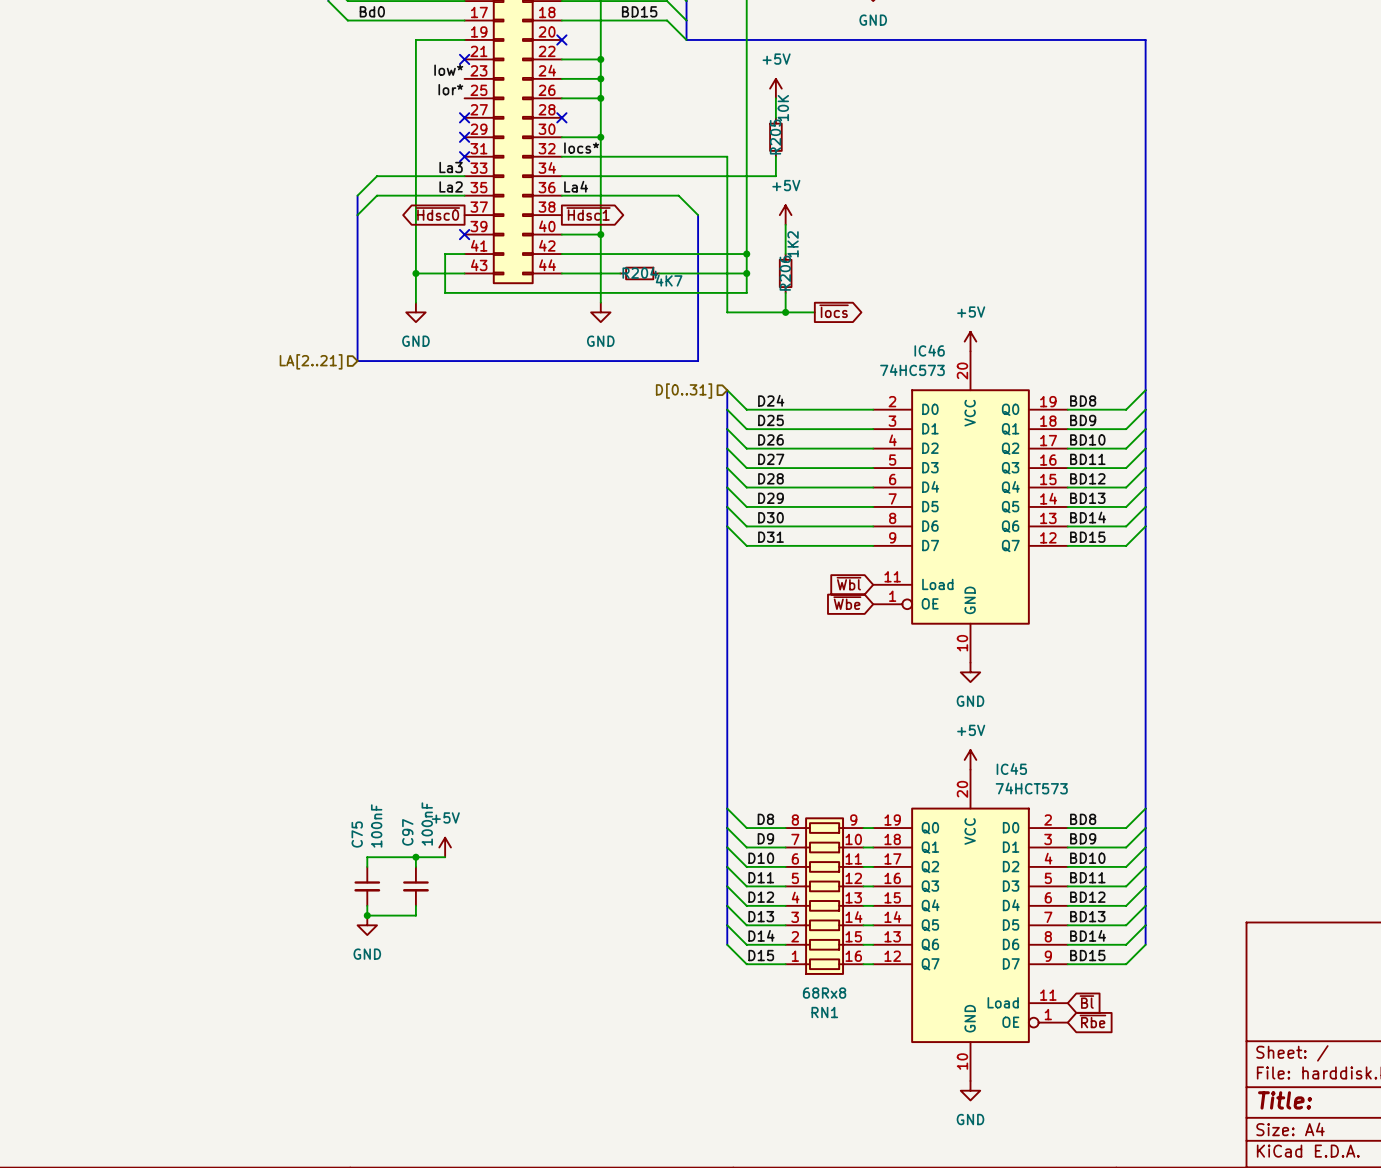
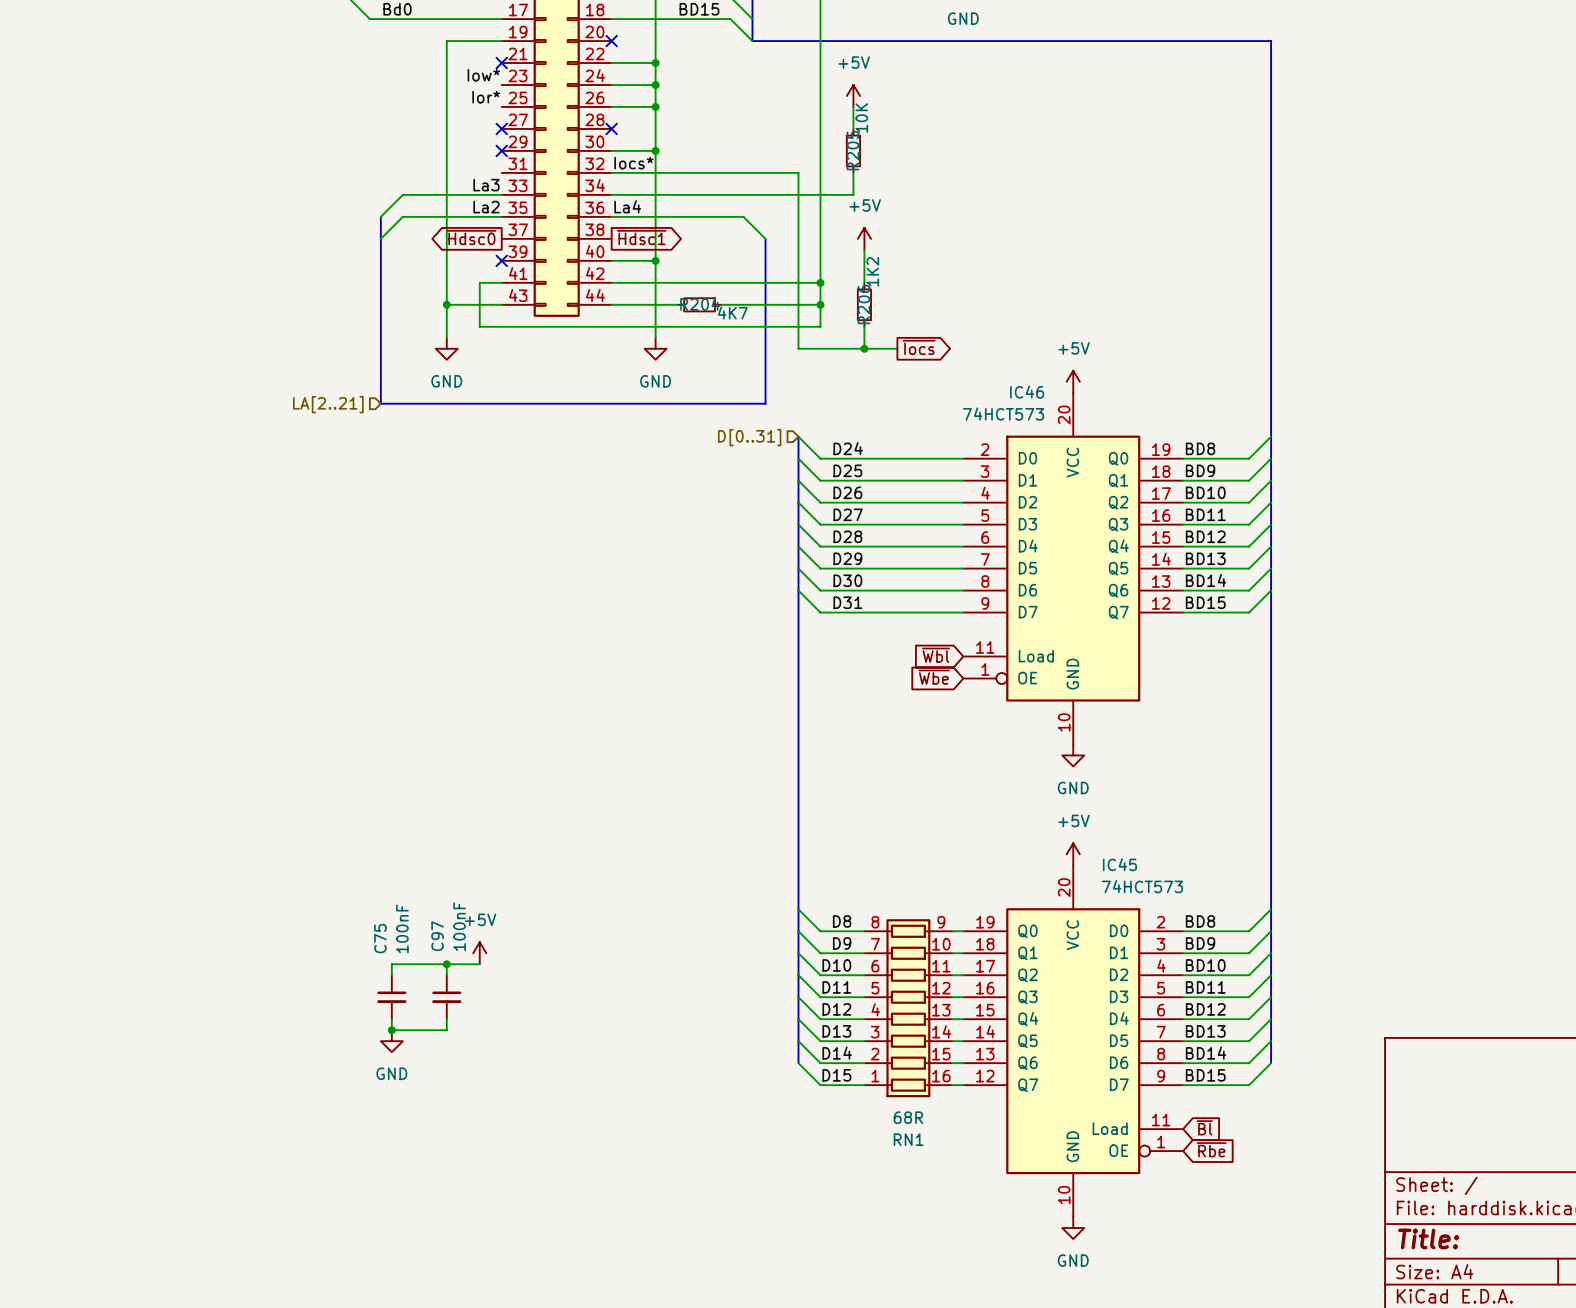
no-connect mark: (464, 156) -> none
IC46 value: 74HC573 (912, 370) -> 74HCT573 (1003, 414)
RN1 value: 68Rx8 (824, 993) -> 68R (908, 1117)

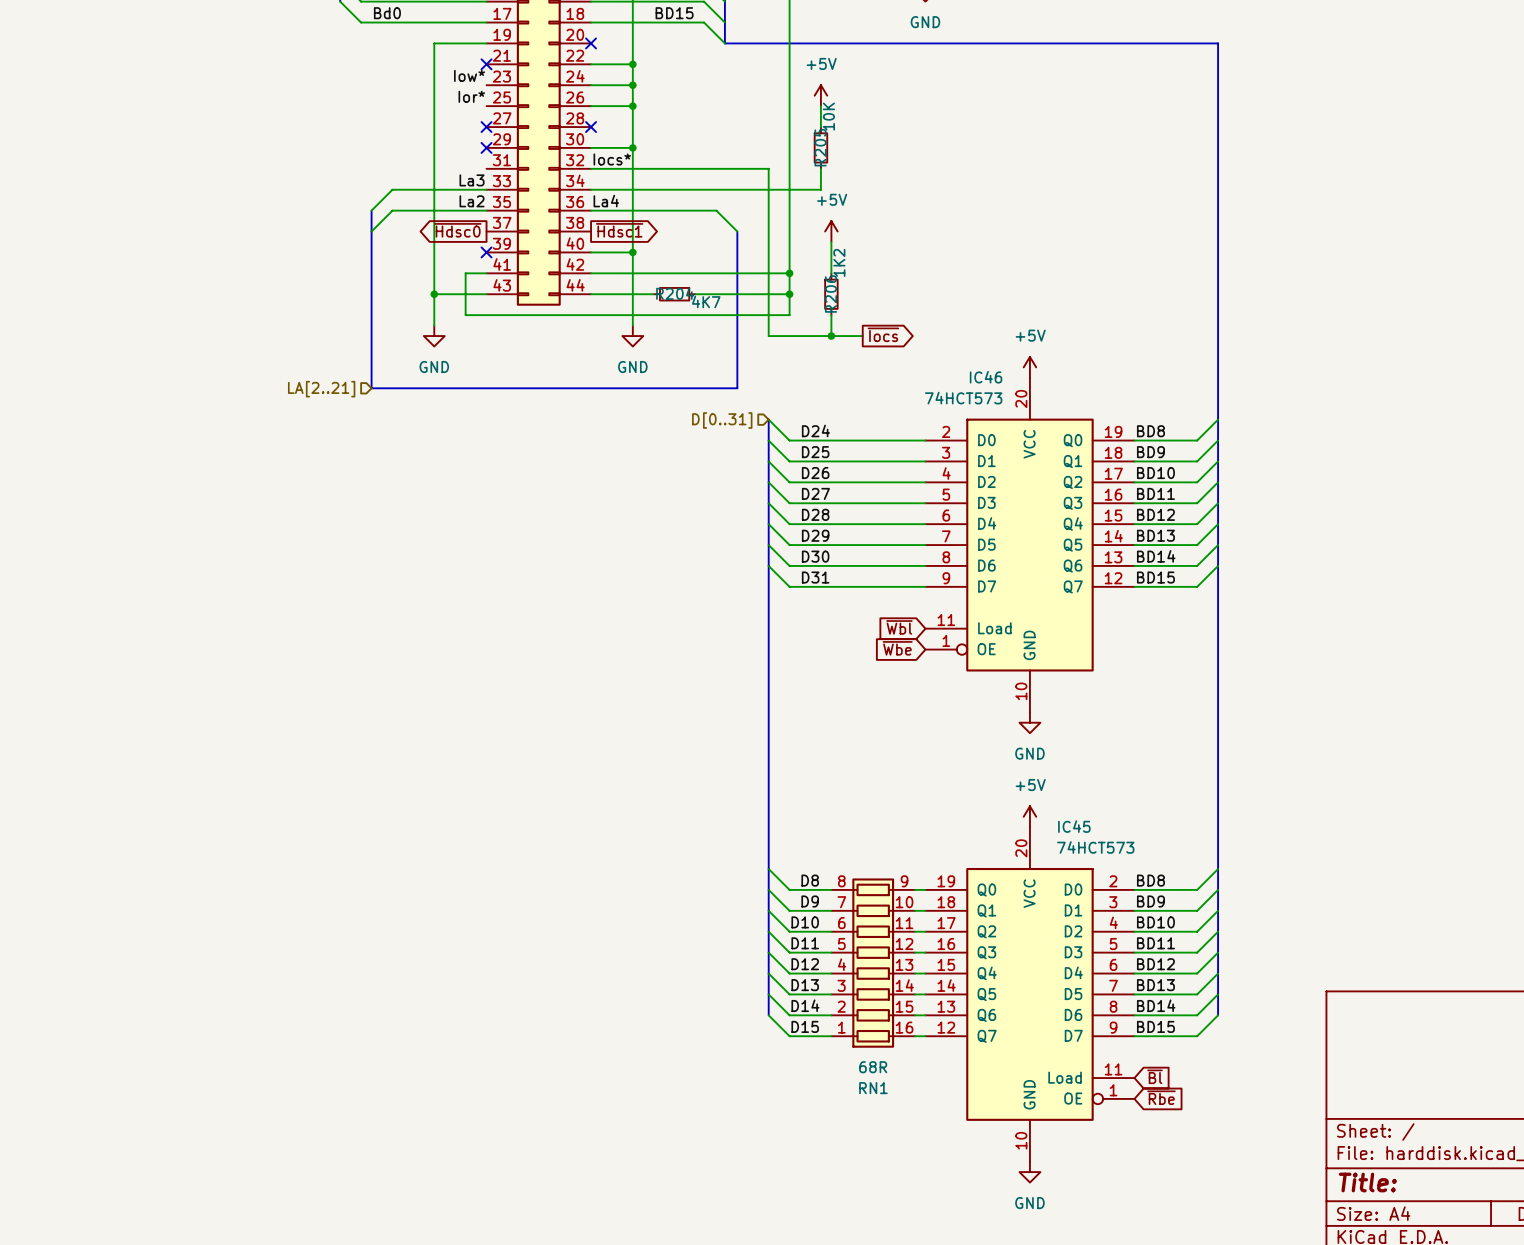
power symbol: +5V (479, 953) -> none
wire: (446, 964) (446, 975) -> none
junction: (446, 964) -> none
wire: (479, 964) (391, 964) (391, 975) -> none
C75: 100nF (391, 997) -> none
C97: 100nF (446, 997) -> none
wire: (391, 1019) (391, 1030) (446, 1030) (446, 1019) -> none
junction: (391, 1030) -> none
power symbol: GND (391, 1041) -> none

